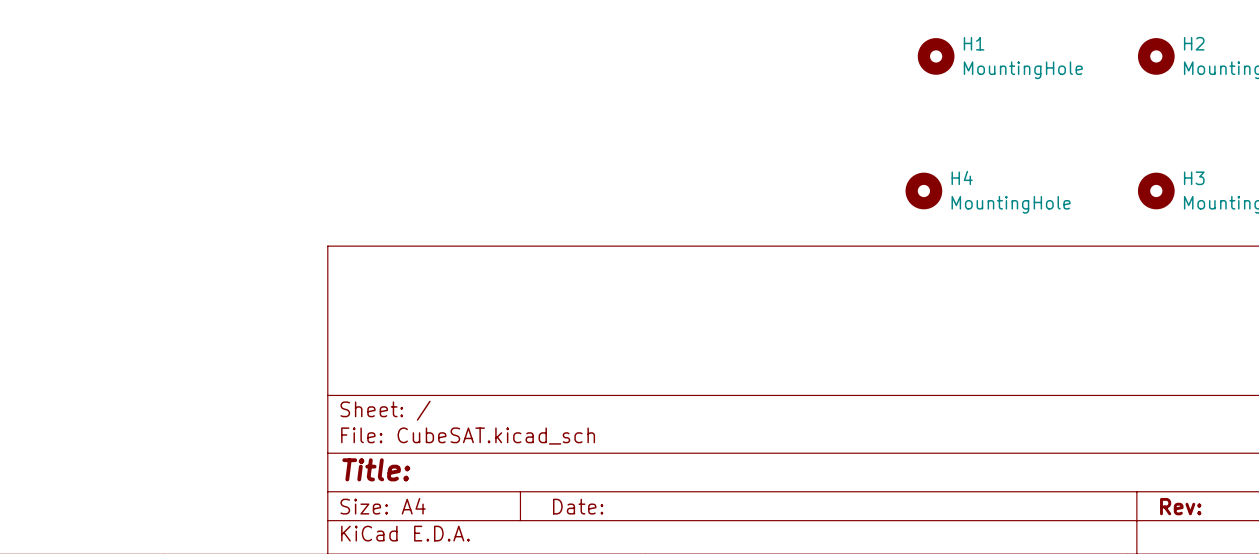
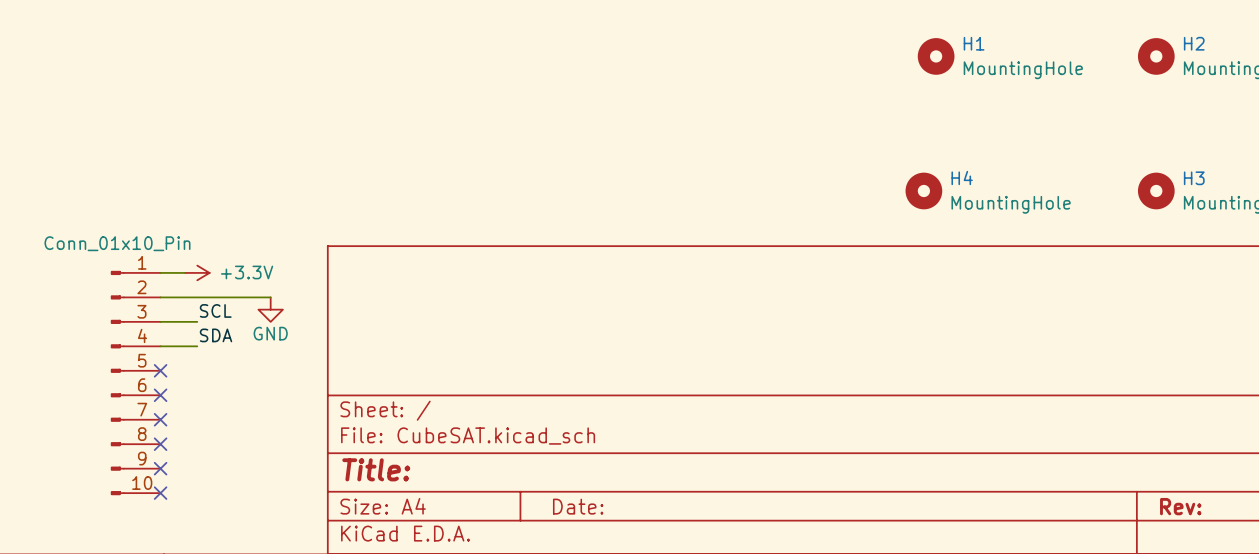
wire: none -> (160, 272) (185, 272)
power symbol: none -> +3.3V (197, 272)
wire: none -> (160, 297) (270, 297)
power symbol: none -> GND (270, 309)
label: none -> SCL (215, 310)
wire: none -> (160, 321) (197, 321)
label: none -> SDA (216, 335)
wire: none -> (160, 346) (197, 346)
no-connect mark: none -> (160, 370)
part: none -> Conn_01x10_Pin (135, 383)
no-connect mark: none -> (160, 395)
no-connect mark: none -> (160, 419)
no-connect mark: none -> (160, 444)
no-connect mark: none -> (160, 468)
no-connect mark: none -> (160, 493)

